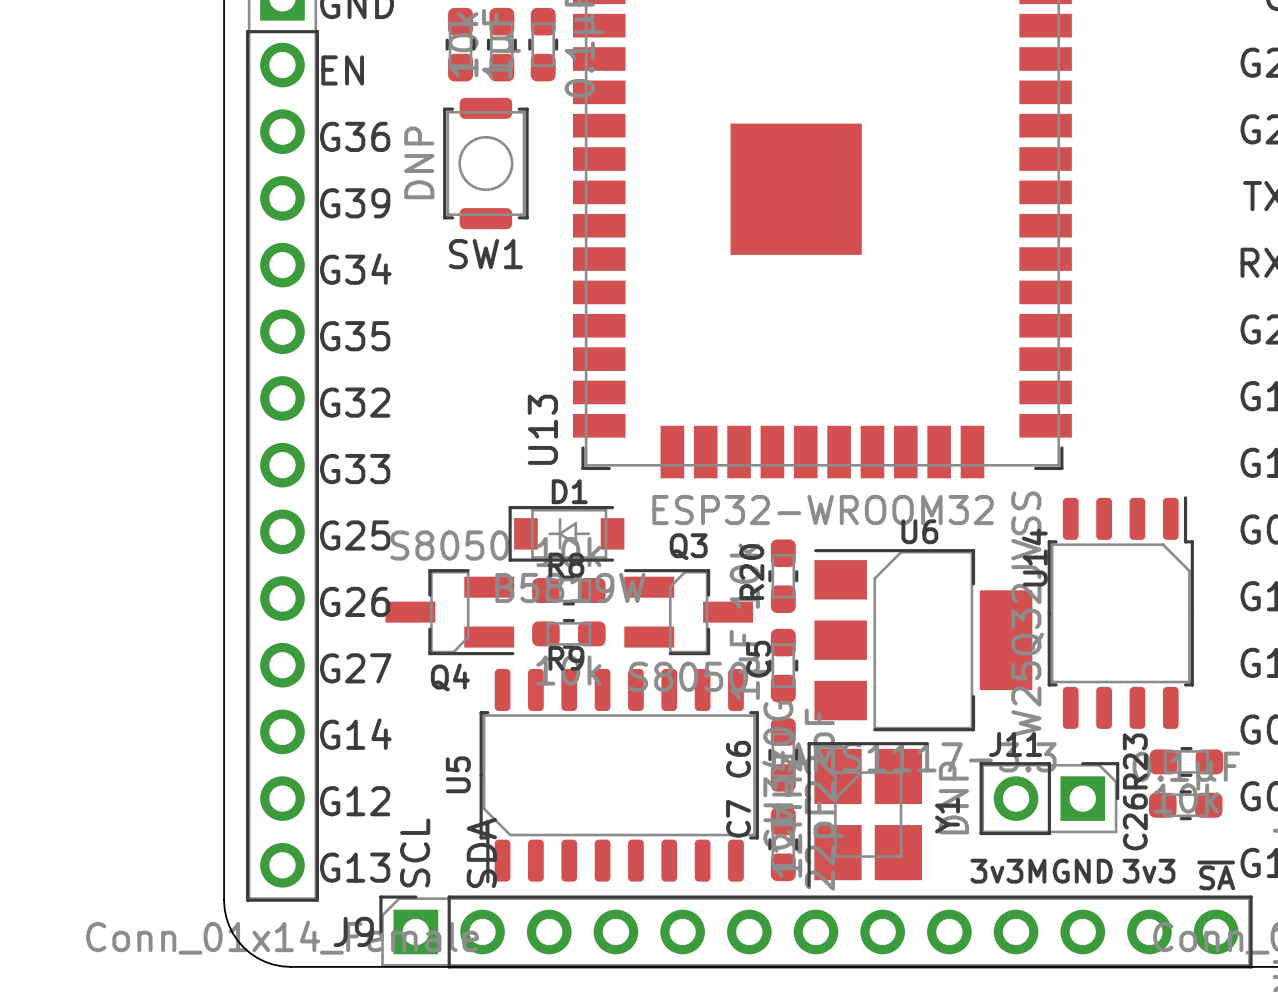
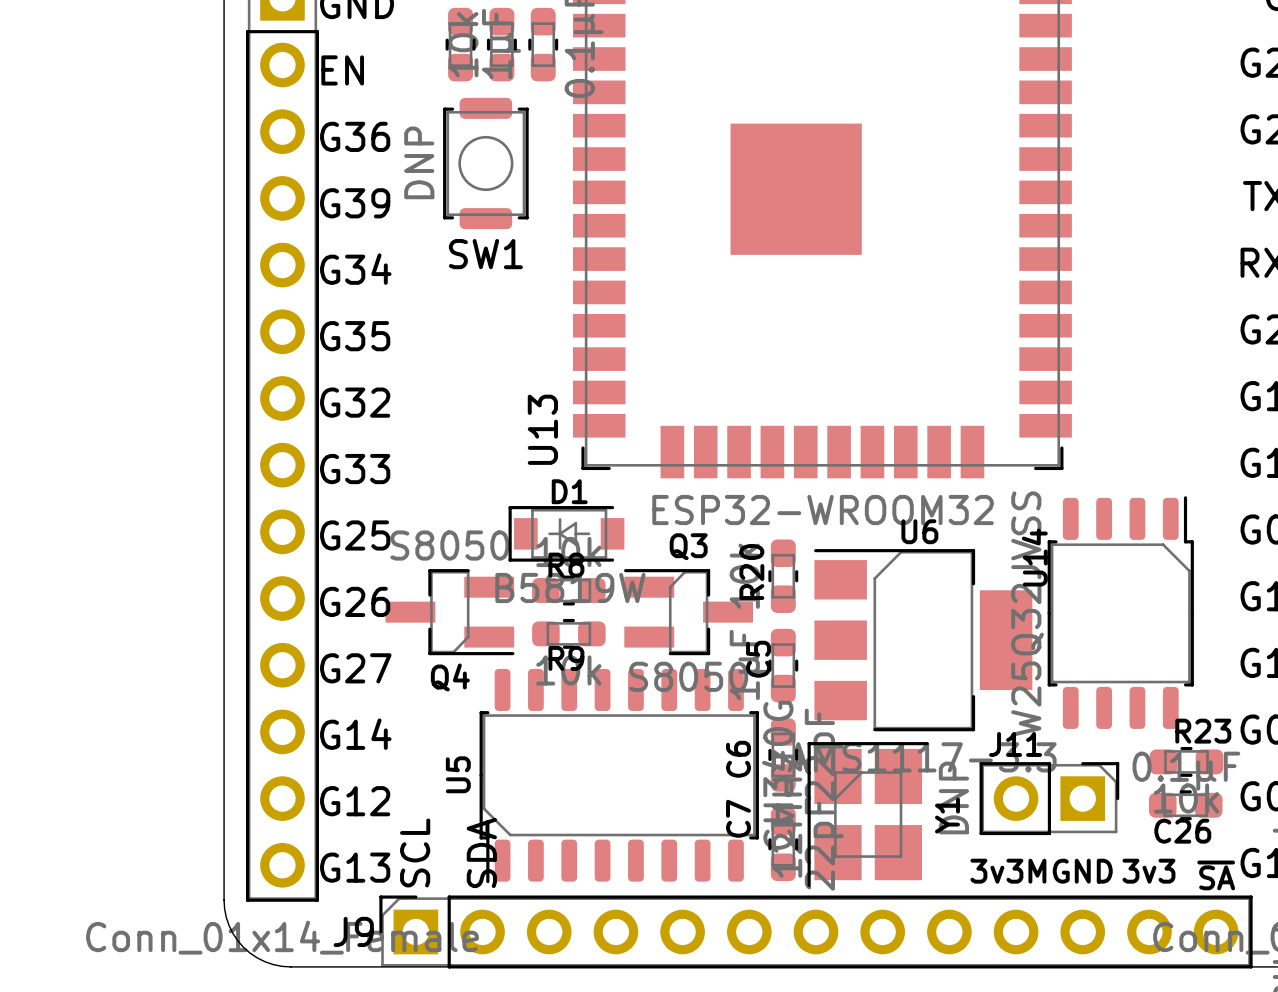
R23 name rotation: 0° (1135, 761) -> 90° clockwise (1203, 731)
C26 name rotation: 0° (1135, 821) -> 90° clockwise (1182, 831)

